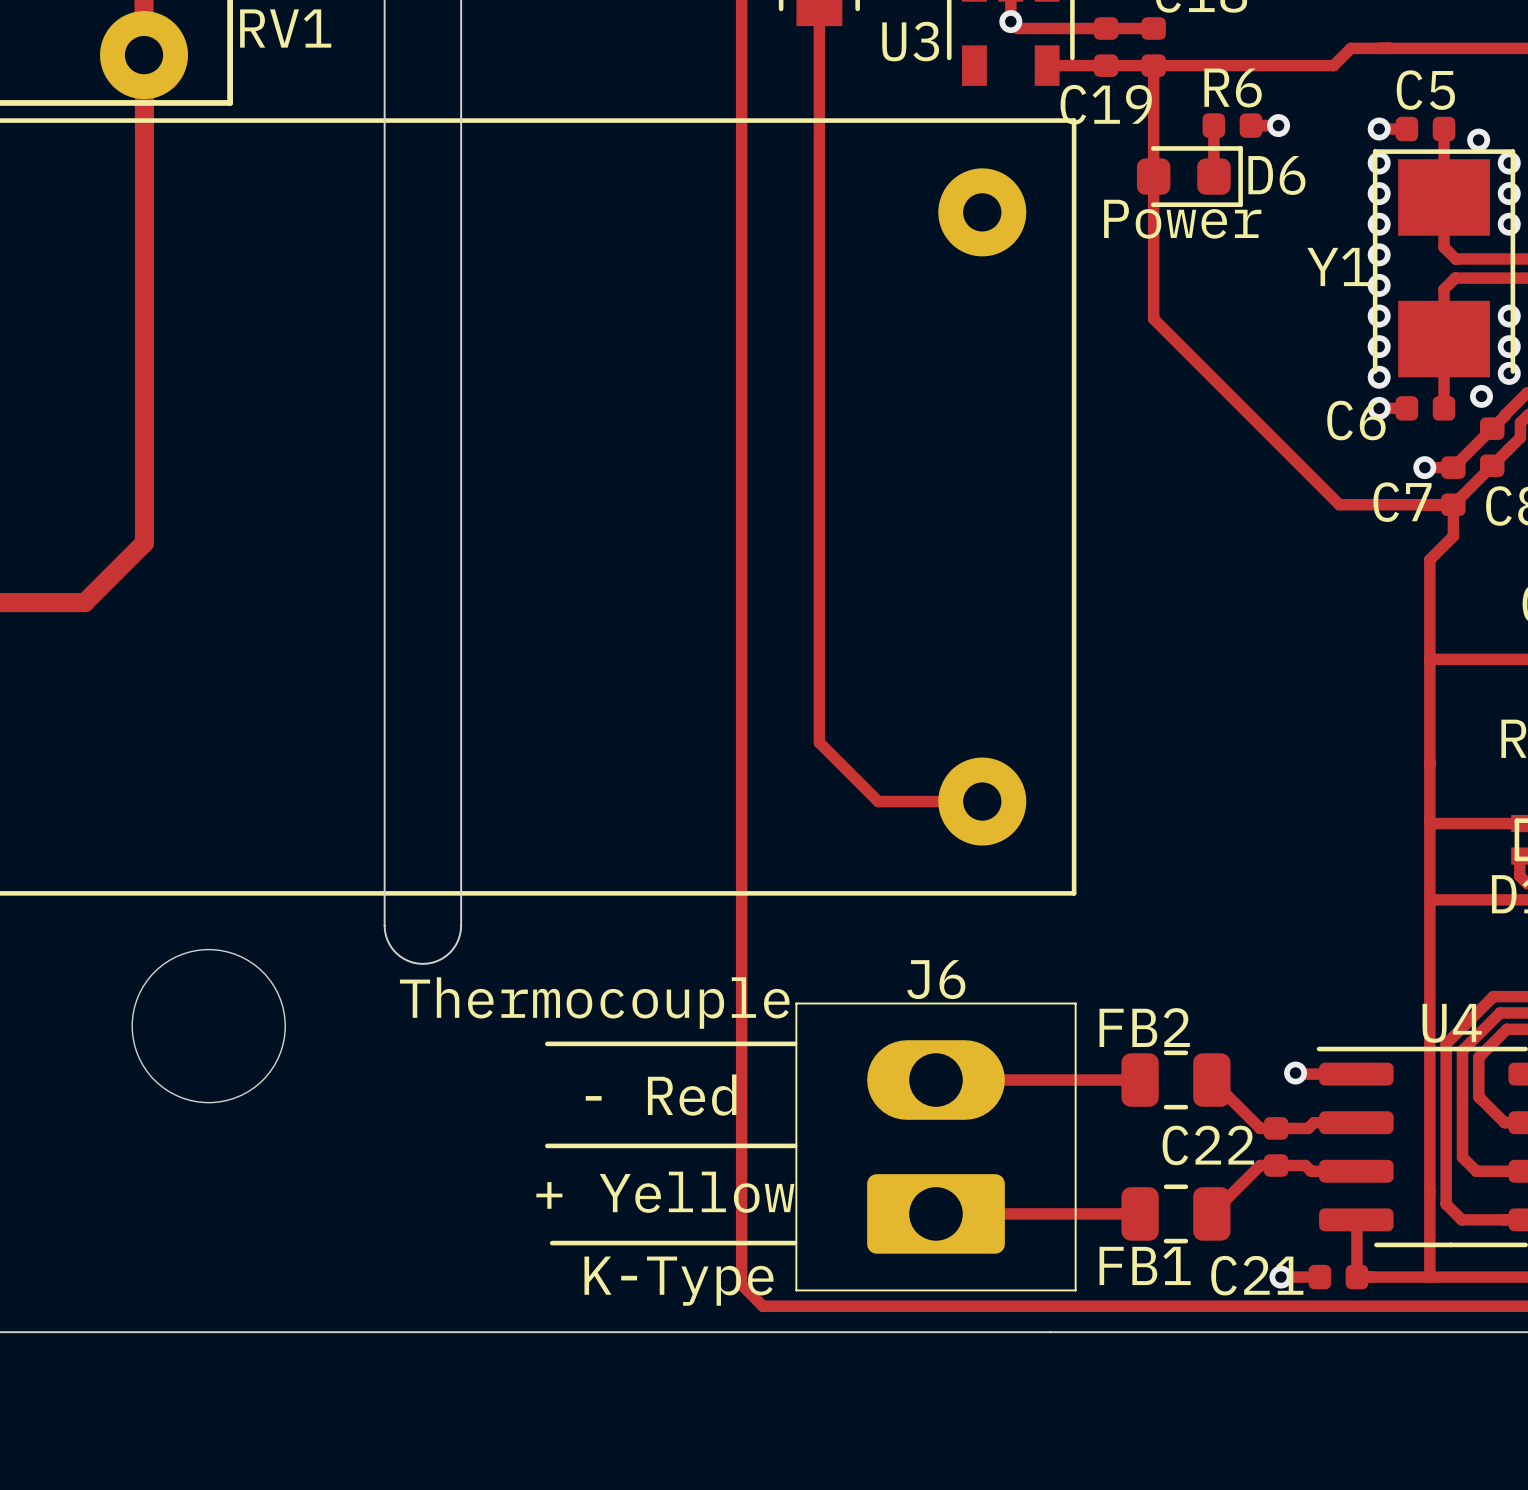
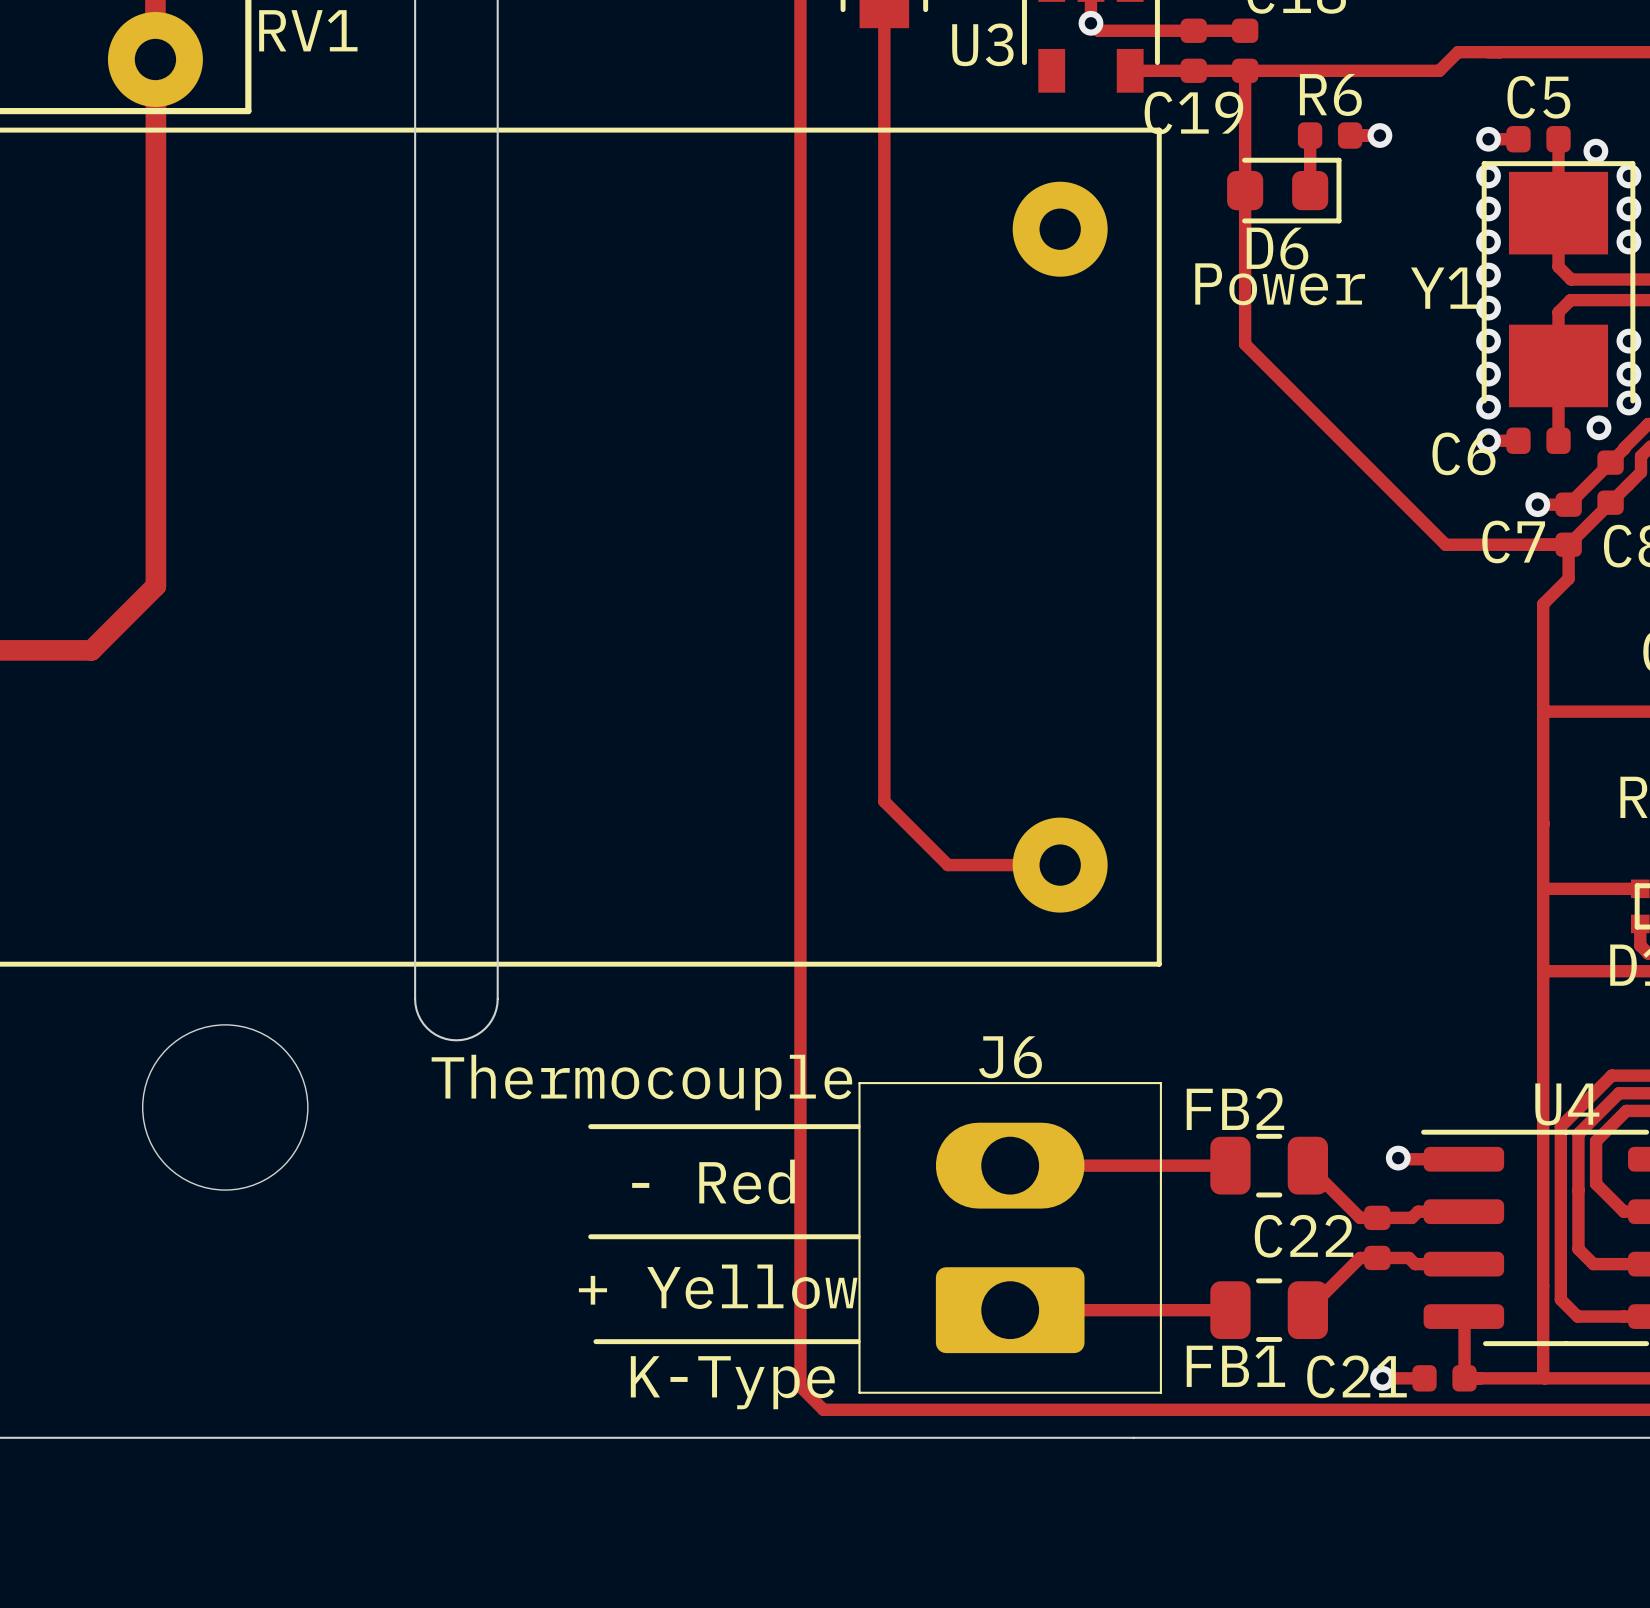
D6 name position: D6 (1276, 175) -> D6 (1277, 248)
text position: Power (1182, 219) -> Power (1280, 284)

